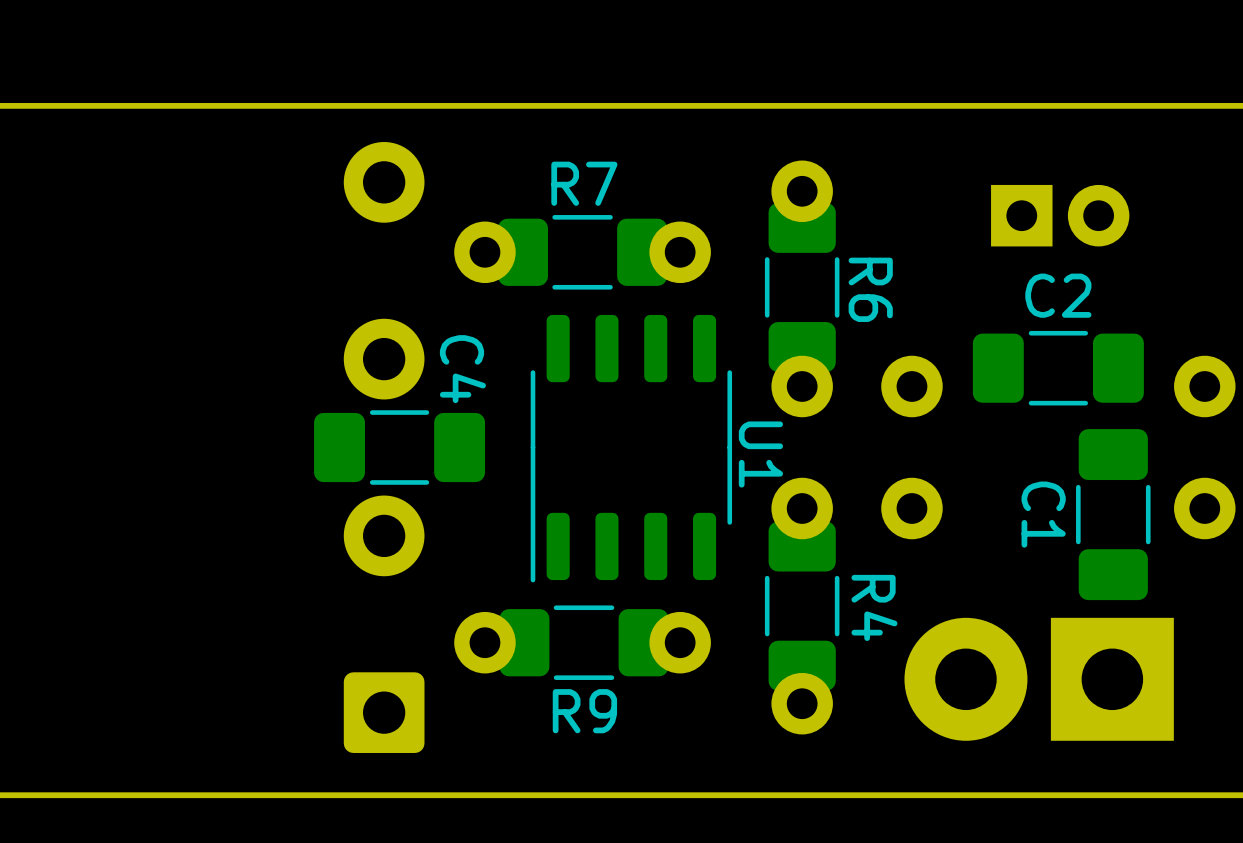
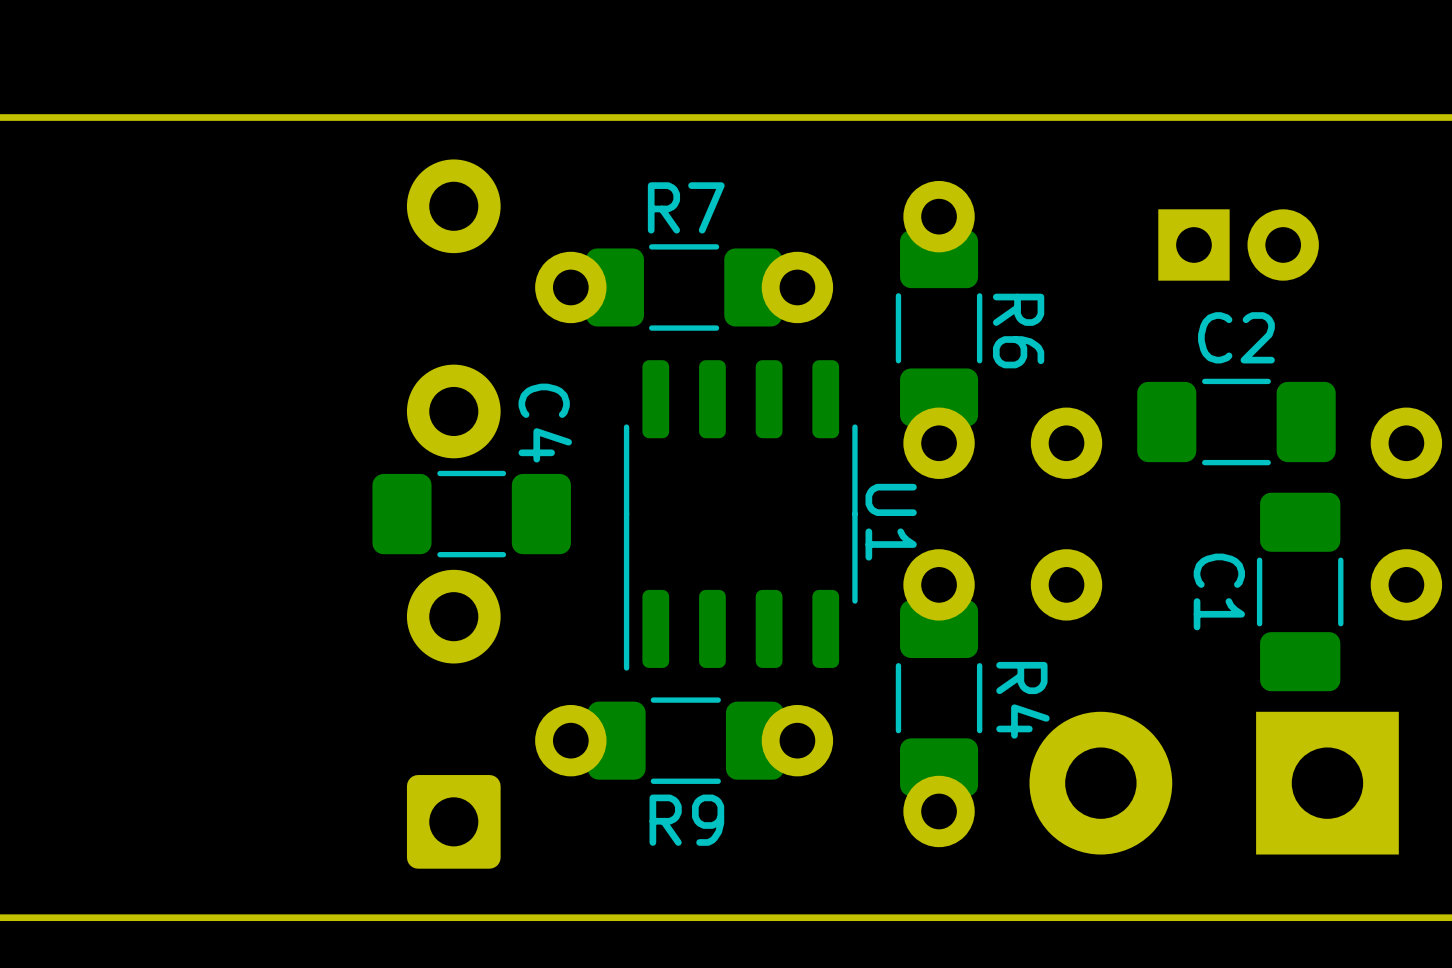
part footprint: [904, 617, 1174, 741] -> [1029, 711, 1399, 855]

